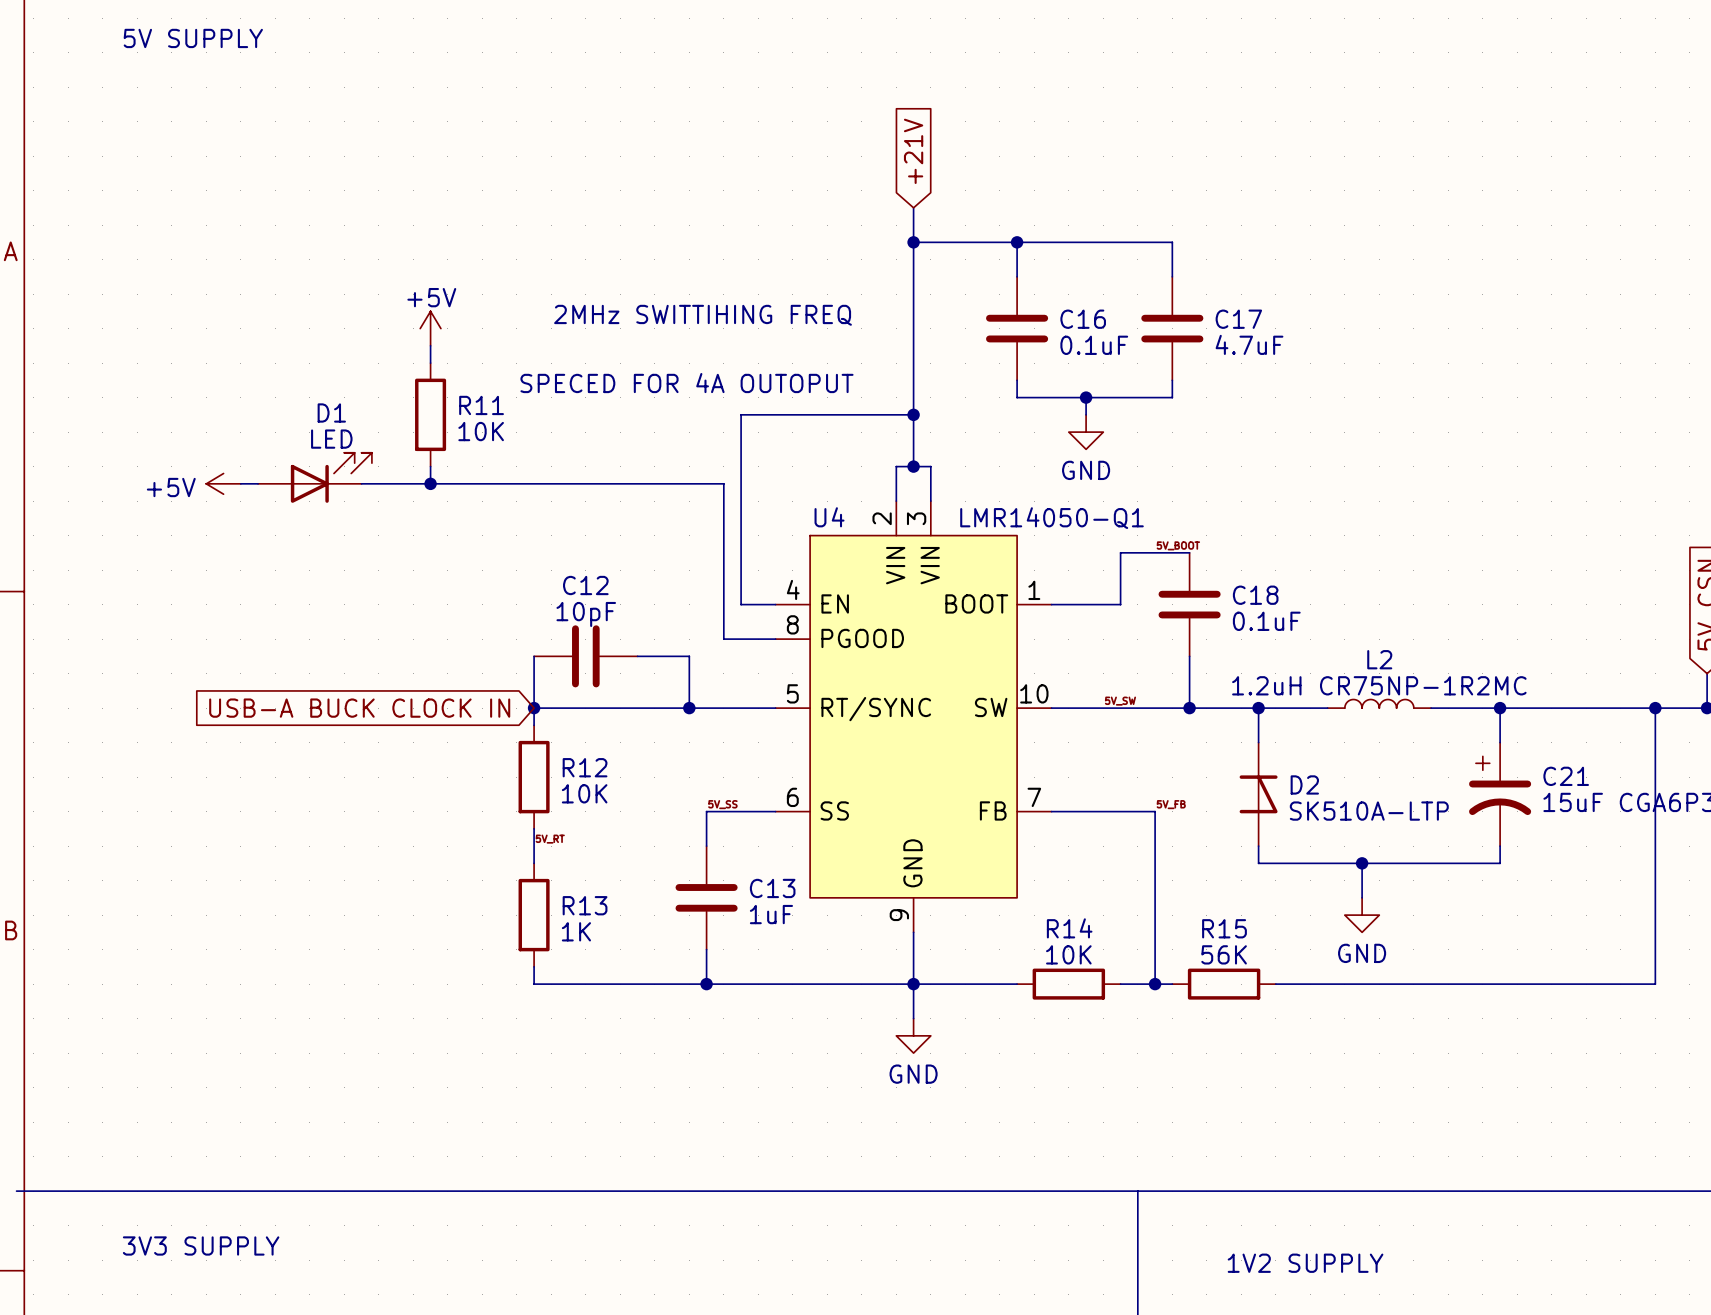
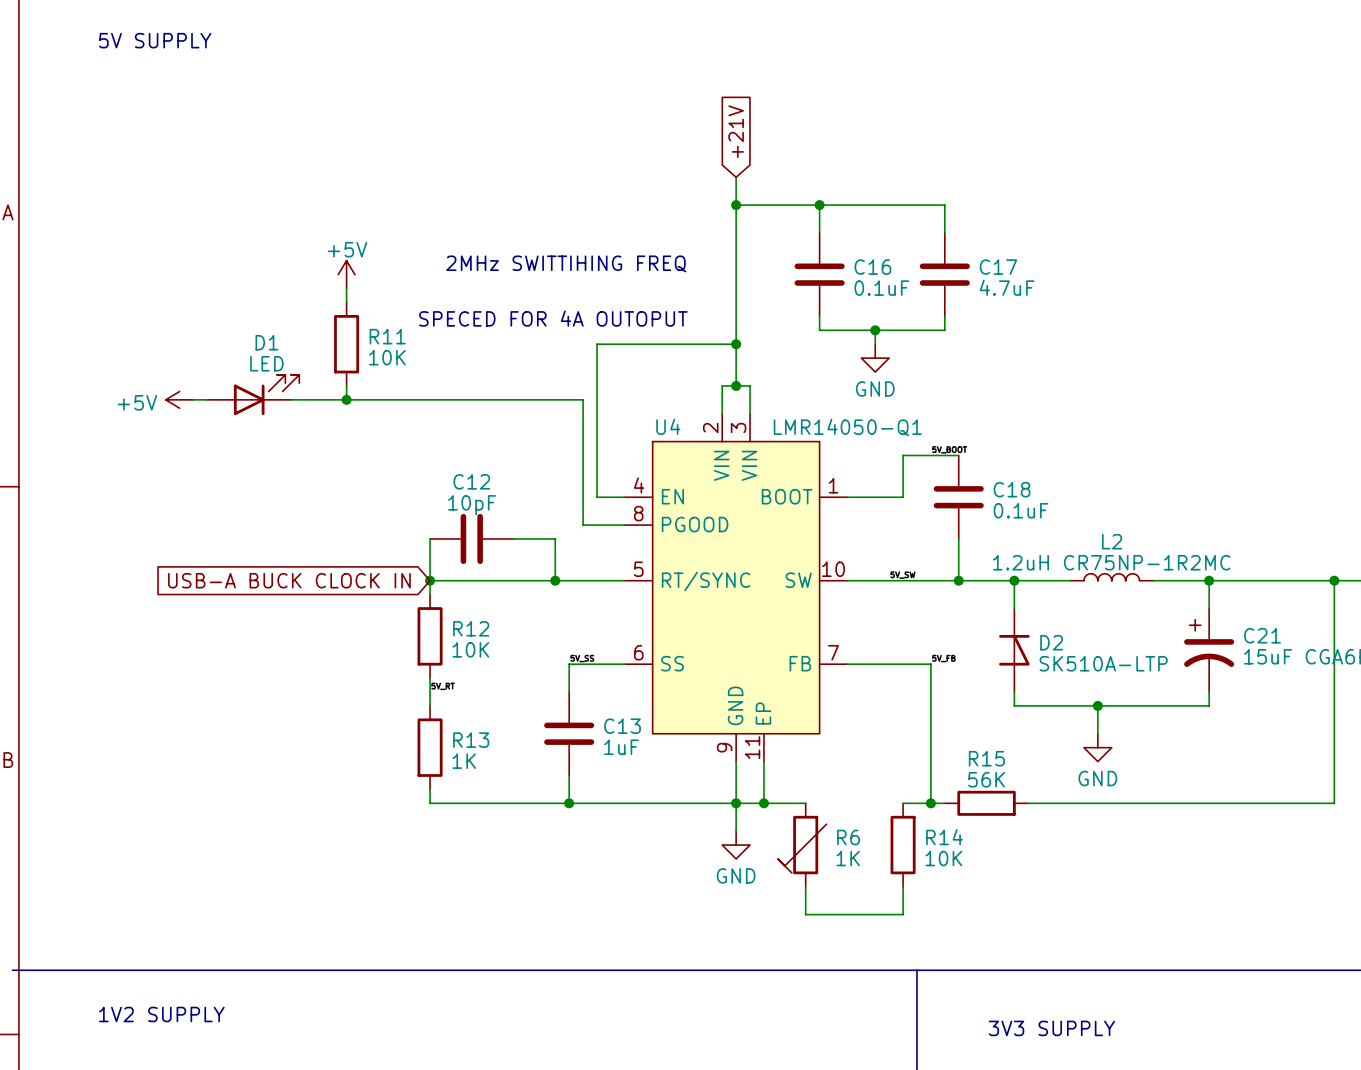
U4 symbol: [775, 501, 1052, 933] -> [624, 413, 848, 762]
wire: none -> (763, 761) (763, 803)
R14 value position: 10K (1068, 954) -> 10K (943, 858)
junction: none -> (763, 803)
wire: (999, 984) (1017, 984) -> none
R14 rotation: 0° (1068, 984) -> 90° clockwise (903, 845)
R14 position: (1068, 984) -> (903, 845)
R6: none -> 1K (802, 845)
wire: none -> (805, 886) (805, 914) (903, 914) (903, 886)
text: 3V3 SUPPLY (201, 1245) -> 1V2 SUPPLY (161, 1014)
text: 1V2 SUPPLY (1305, 1263) -> 3V3 SUPPLY (1051, 1028)

